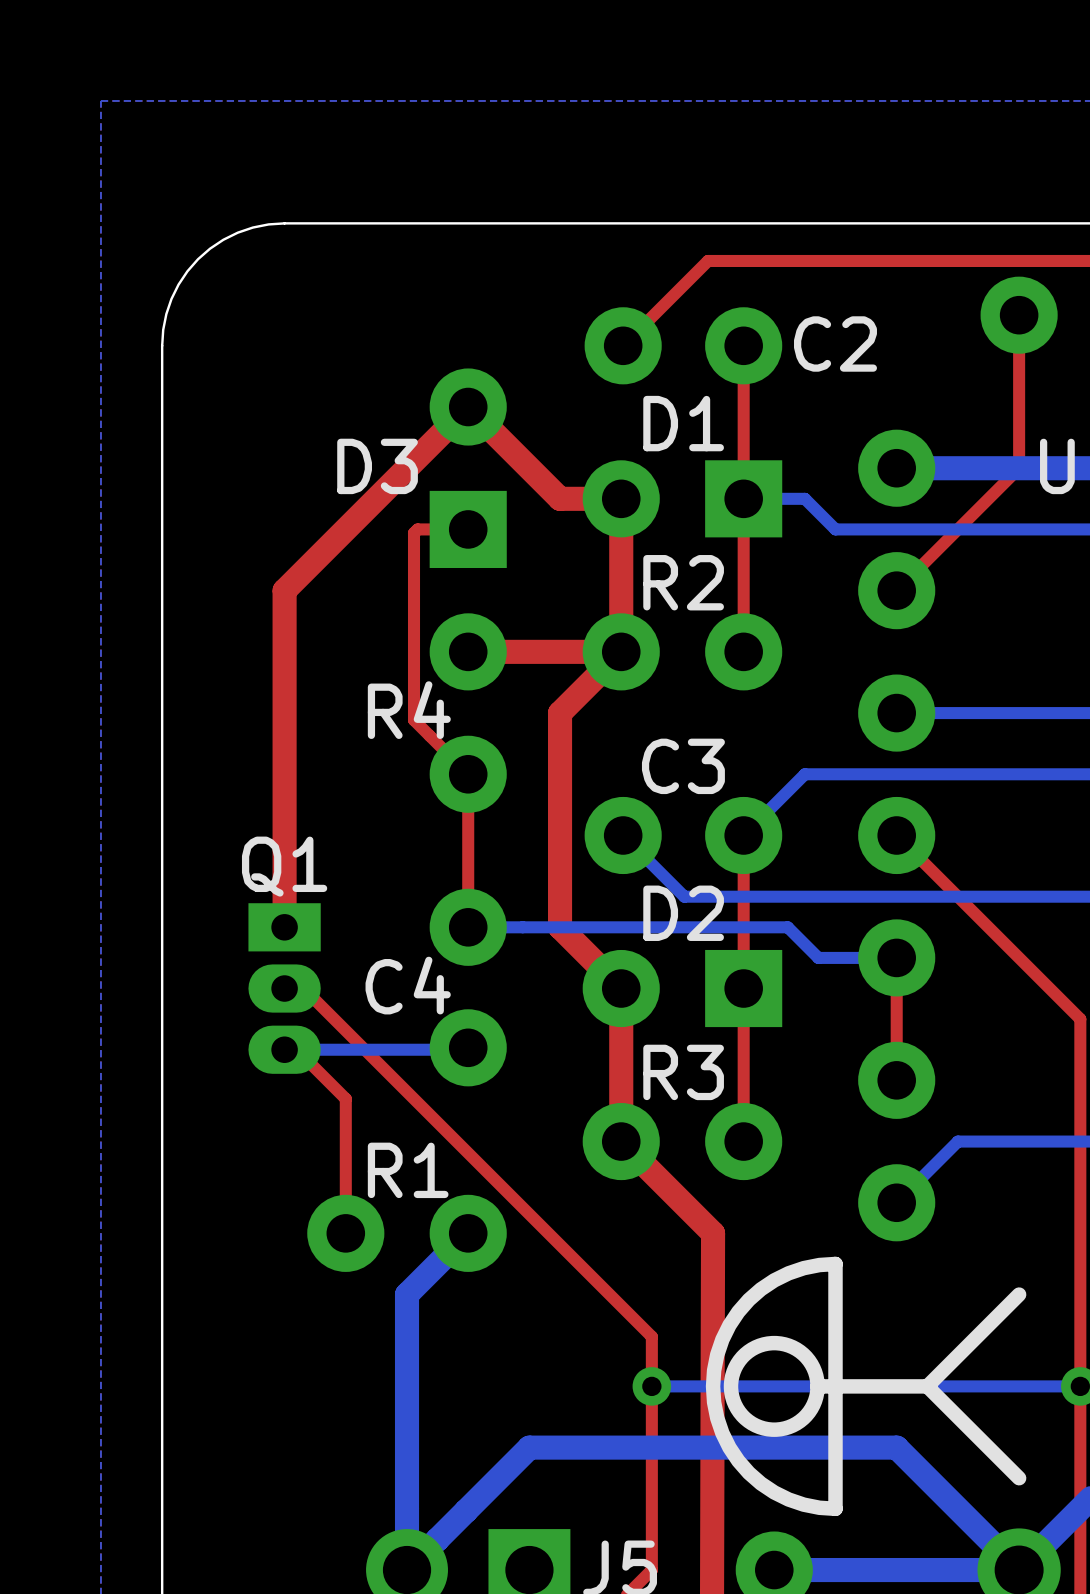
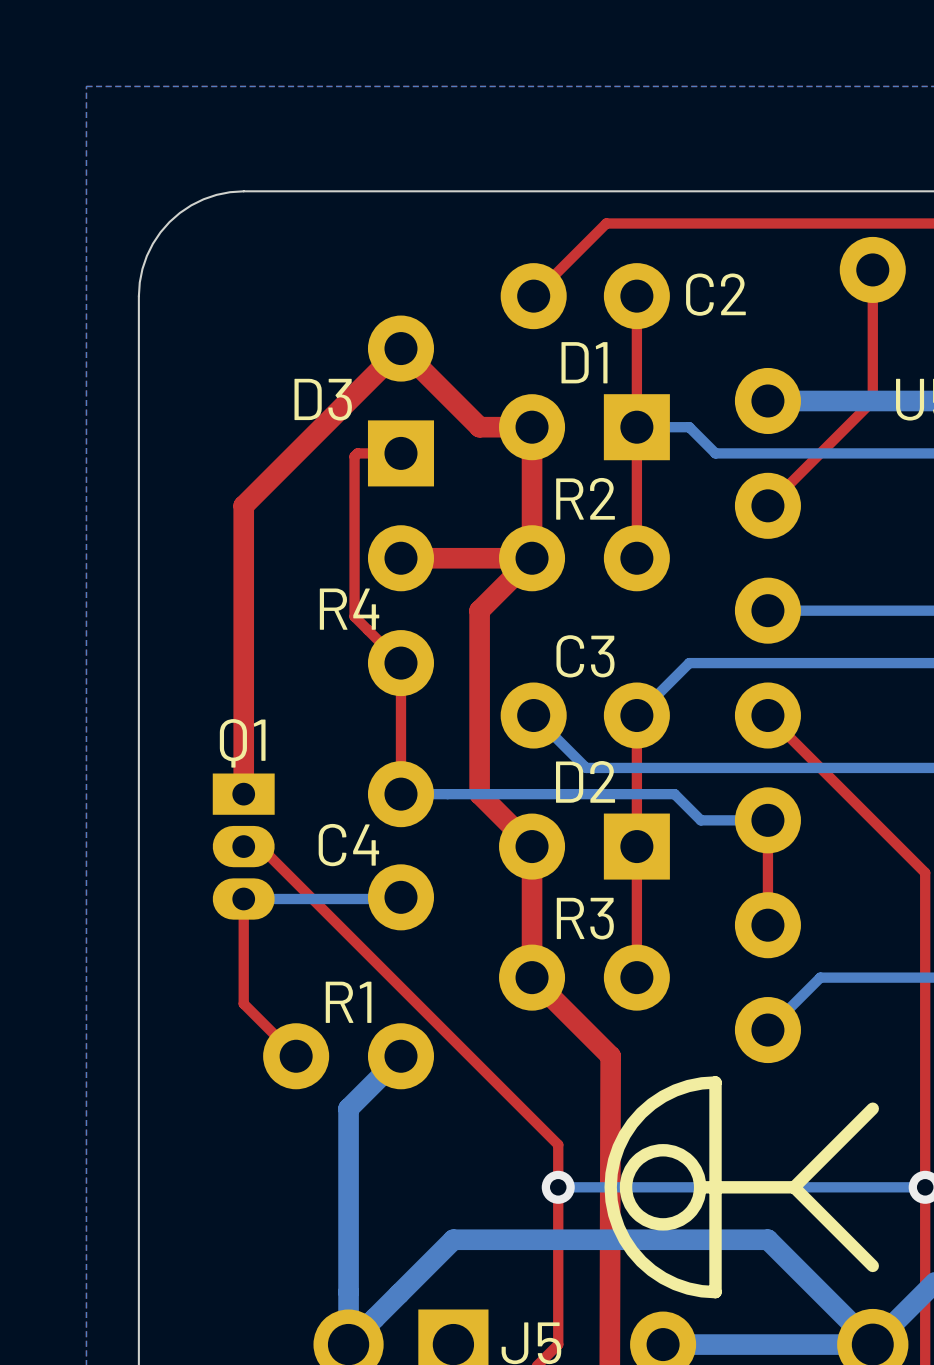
top track: (284, 1049) (296, 1049) (345, 1098) (345, 1233) -> (243, 898) (243, 1003) (296, 1056)

